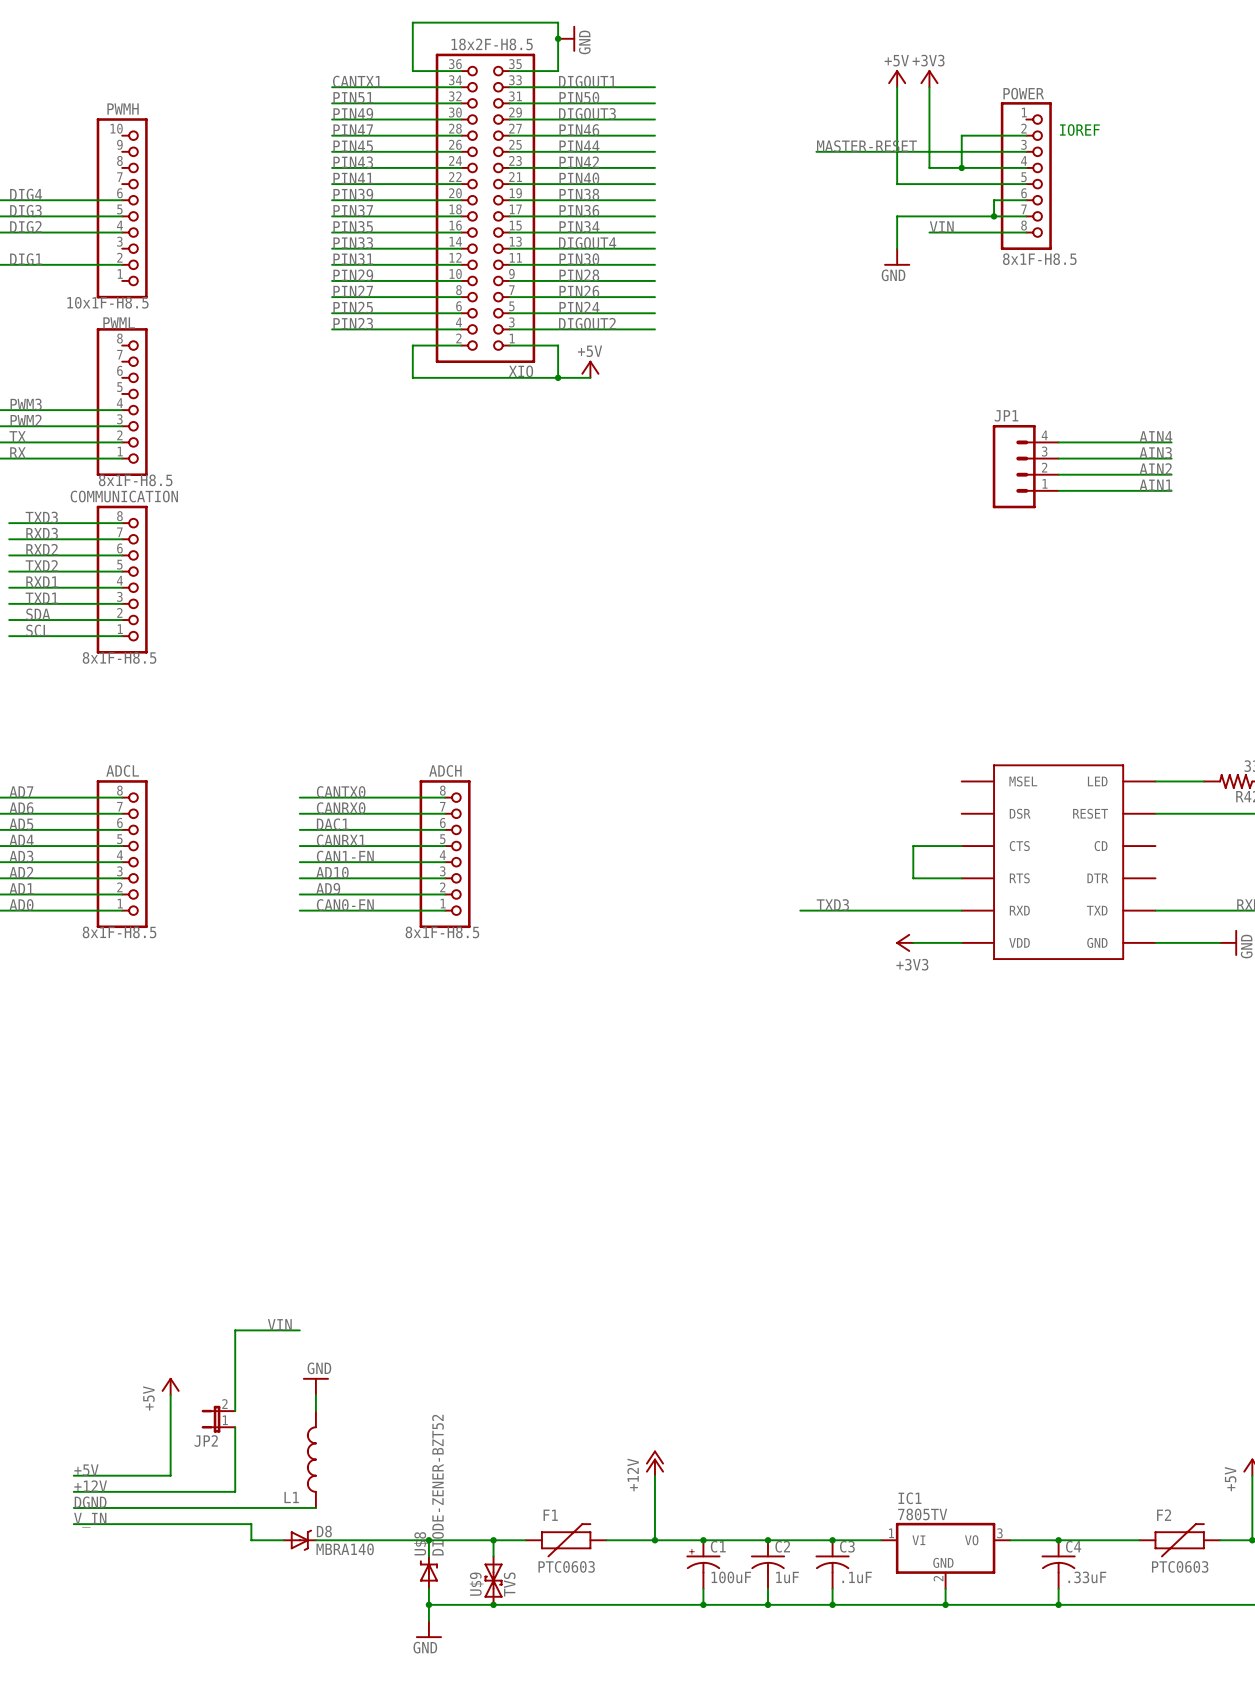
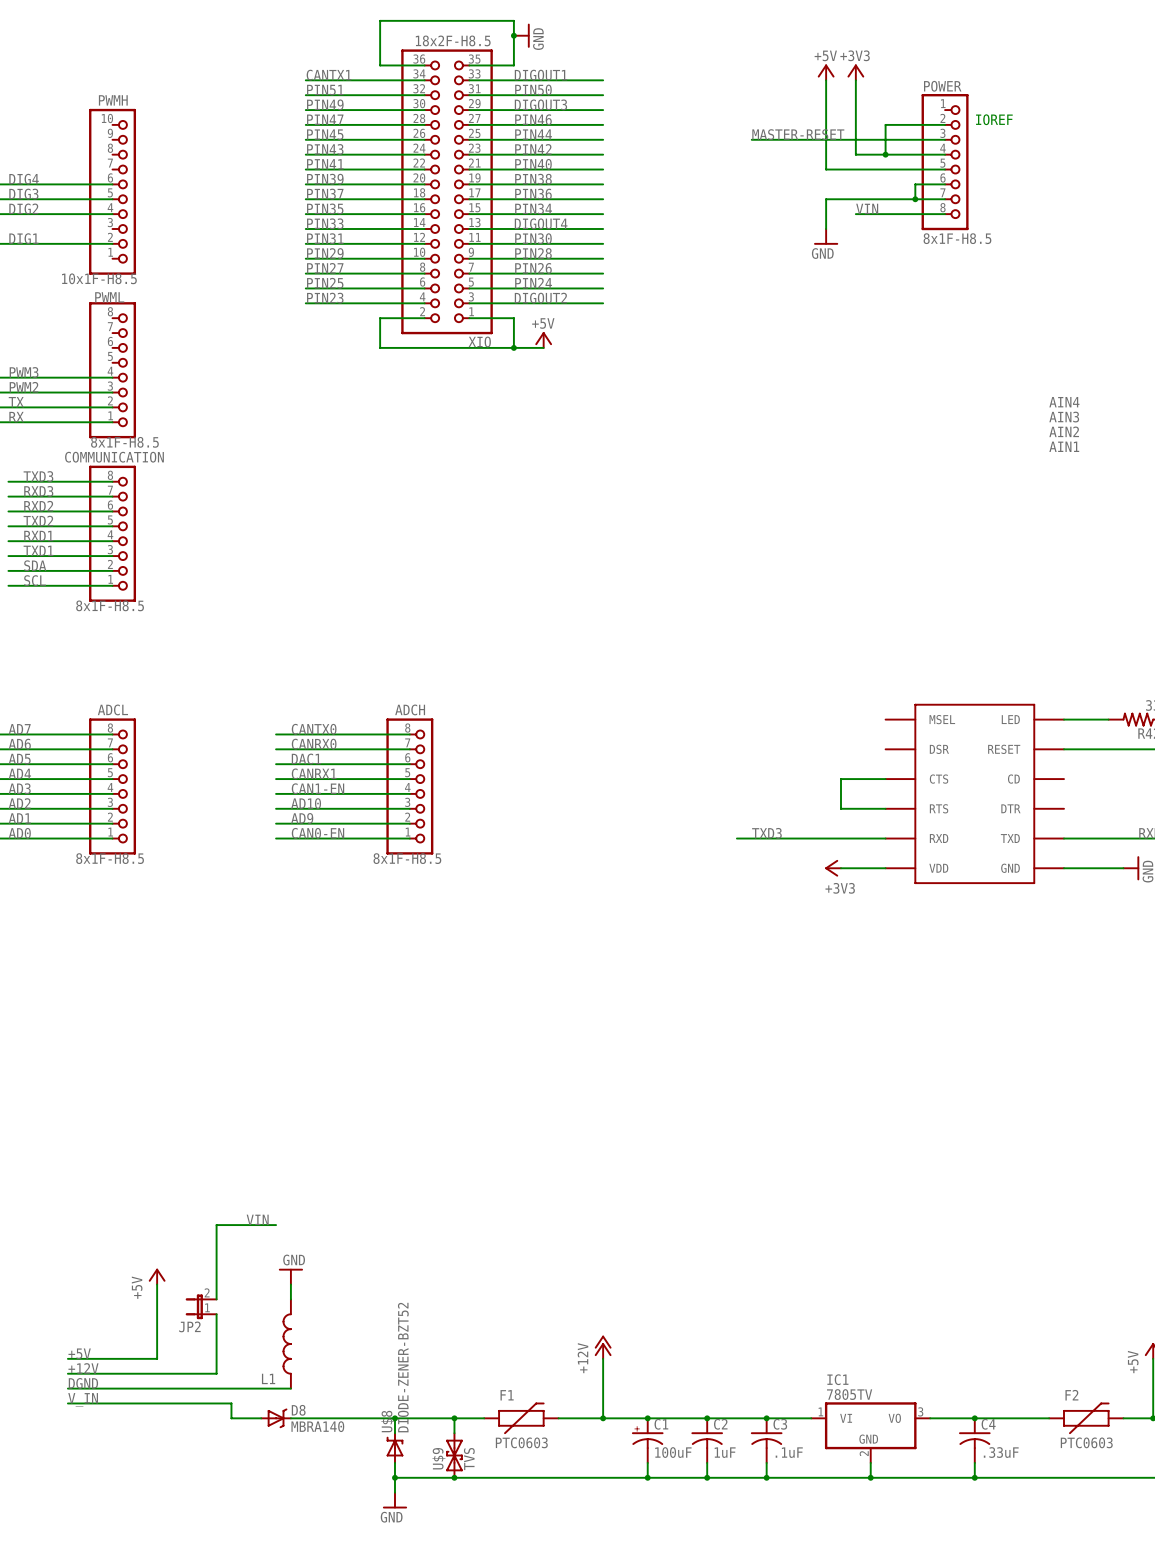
wire: (1058, 442) (1171, 442) -> none
wire: (1058, 458) (1171, 458) -> none
JP1: (1025, 466) -> none
wire: (1058, 474) (1171, 474) -> none
wire: (1058, 490) (1171, 490) -> none

